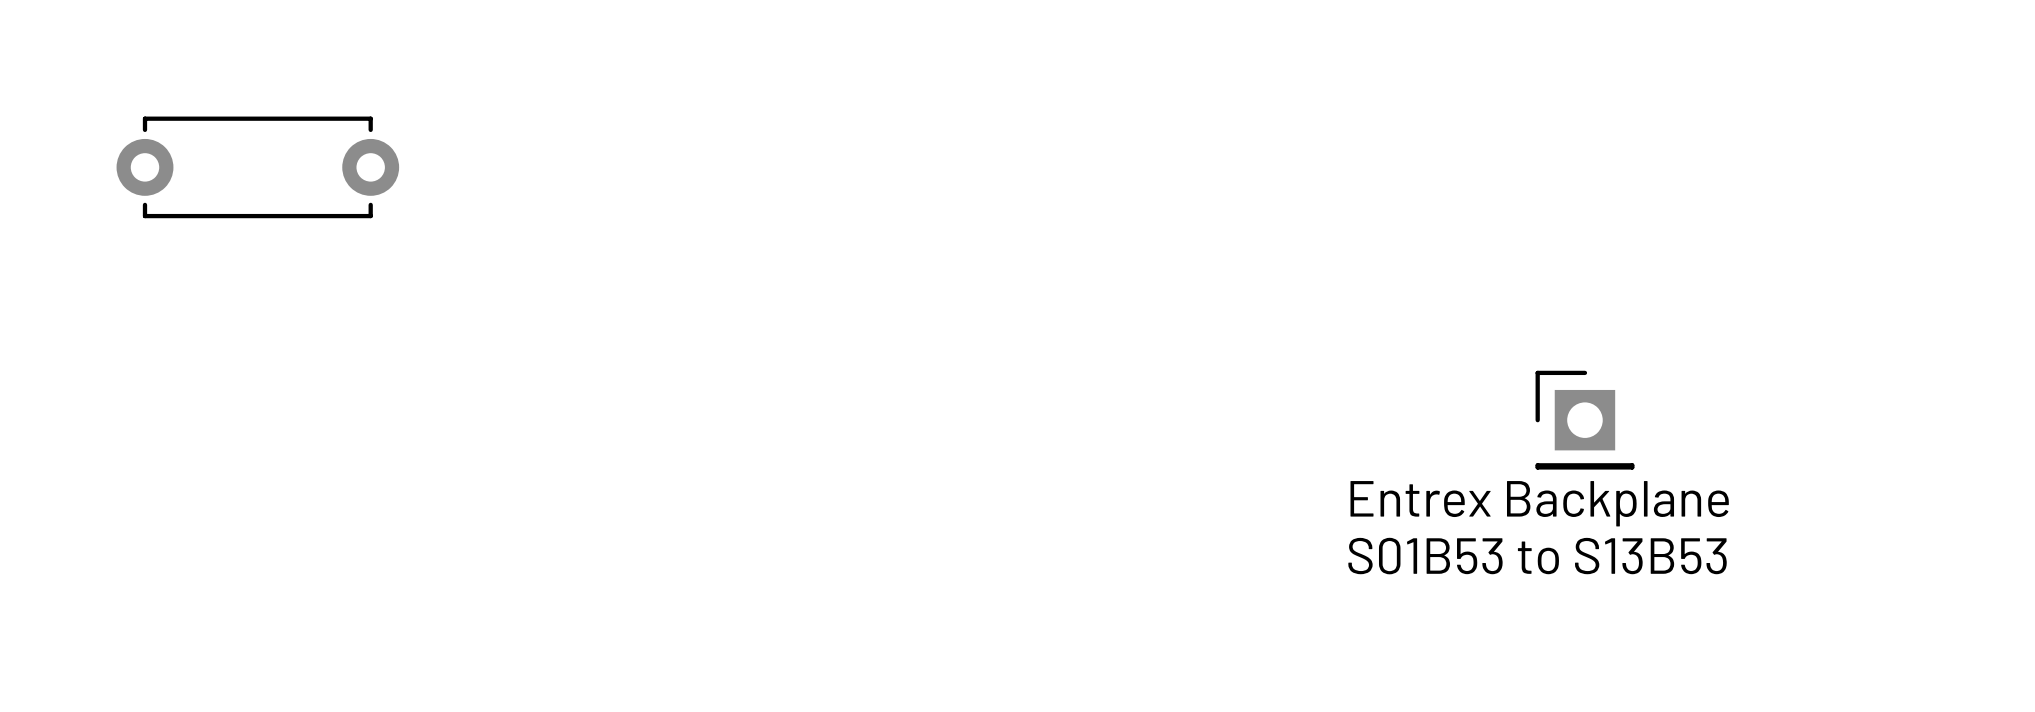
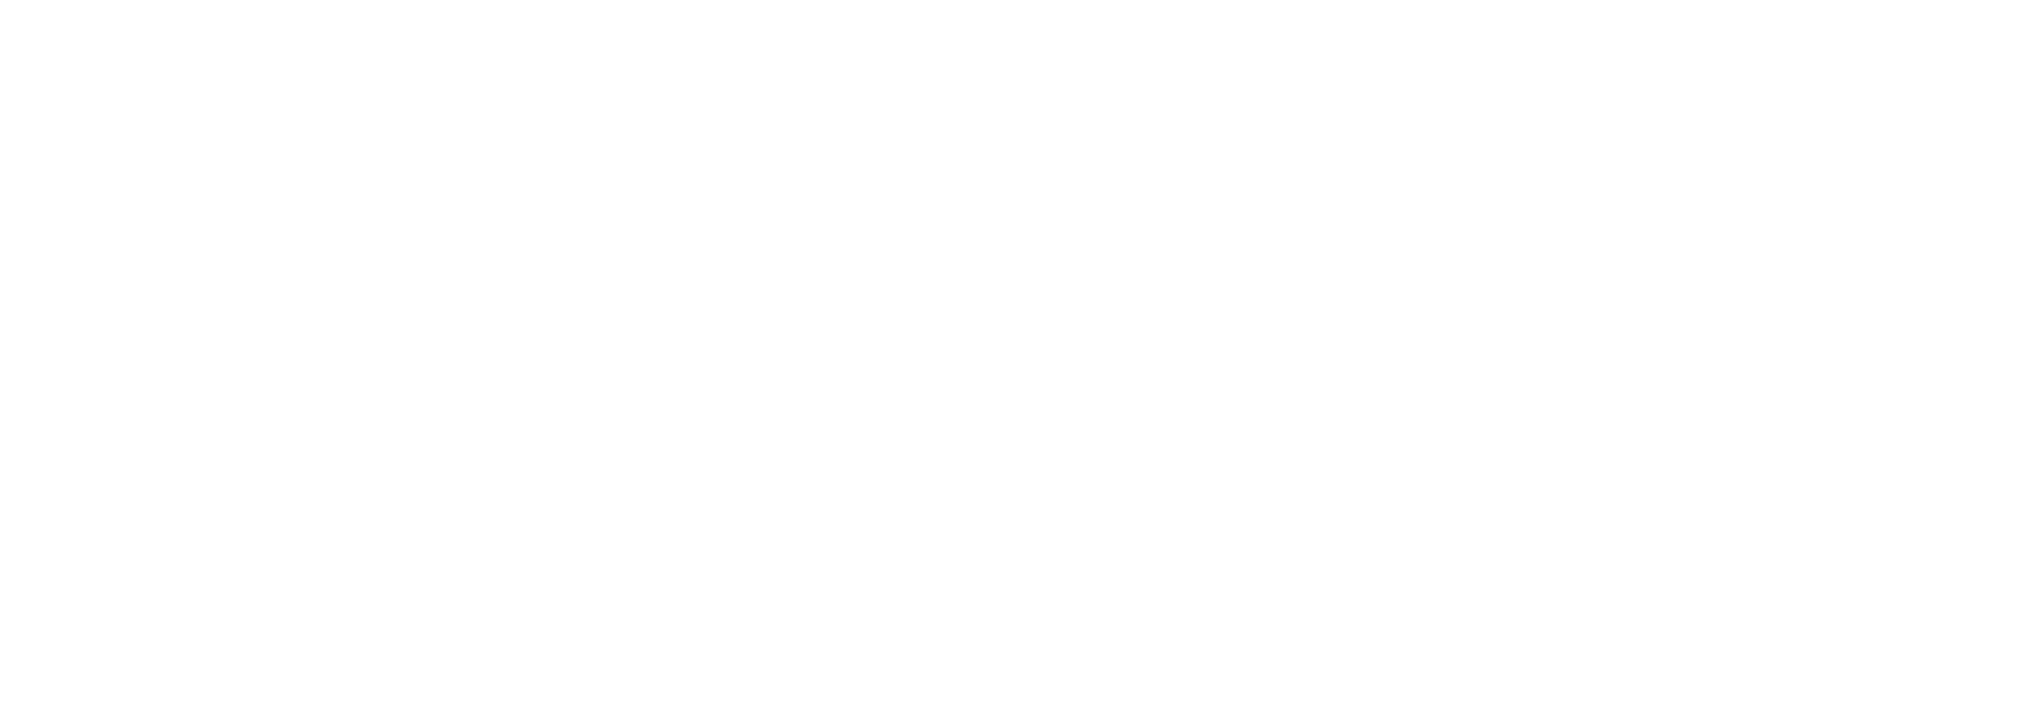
part: (257, 167) -> none
part: (1584, 420) -> none
text: Entrex Backplane (1539, 503) -> none
text: S01B53 to S13B53 (1537, 556) -> none

